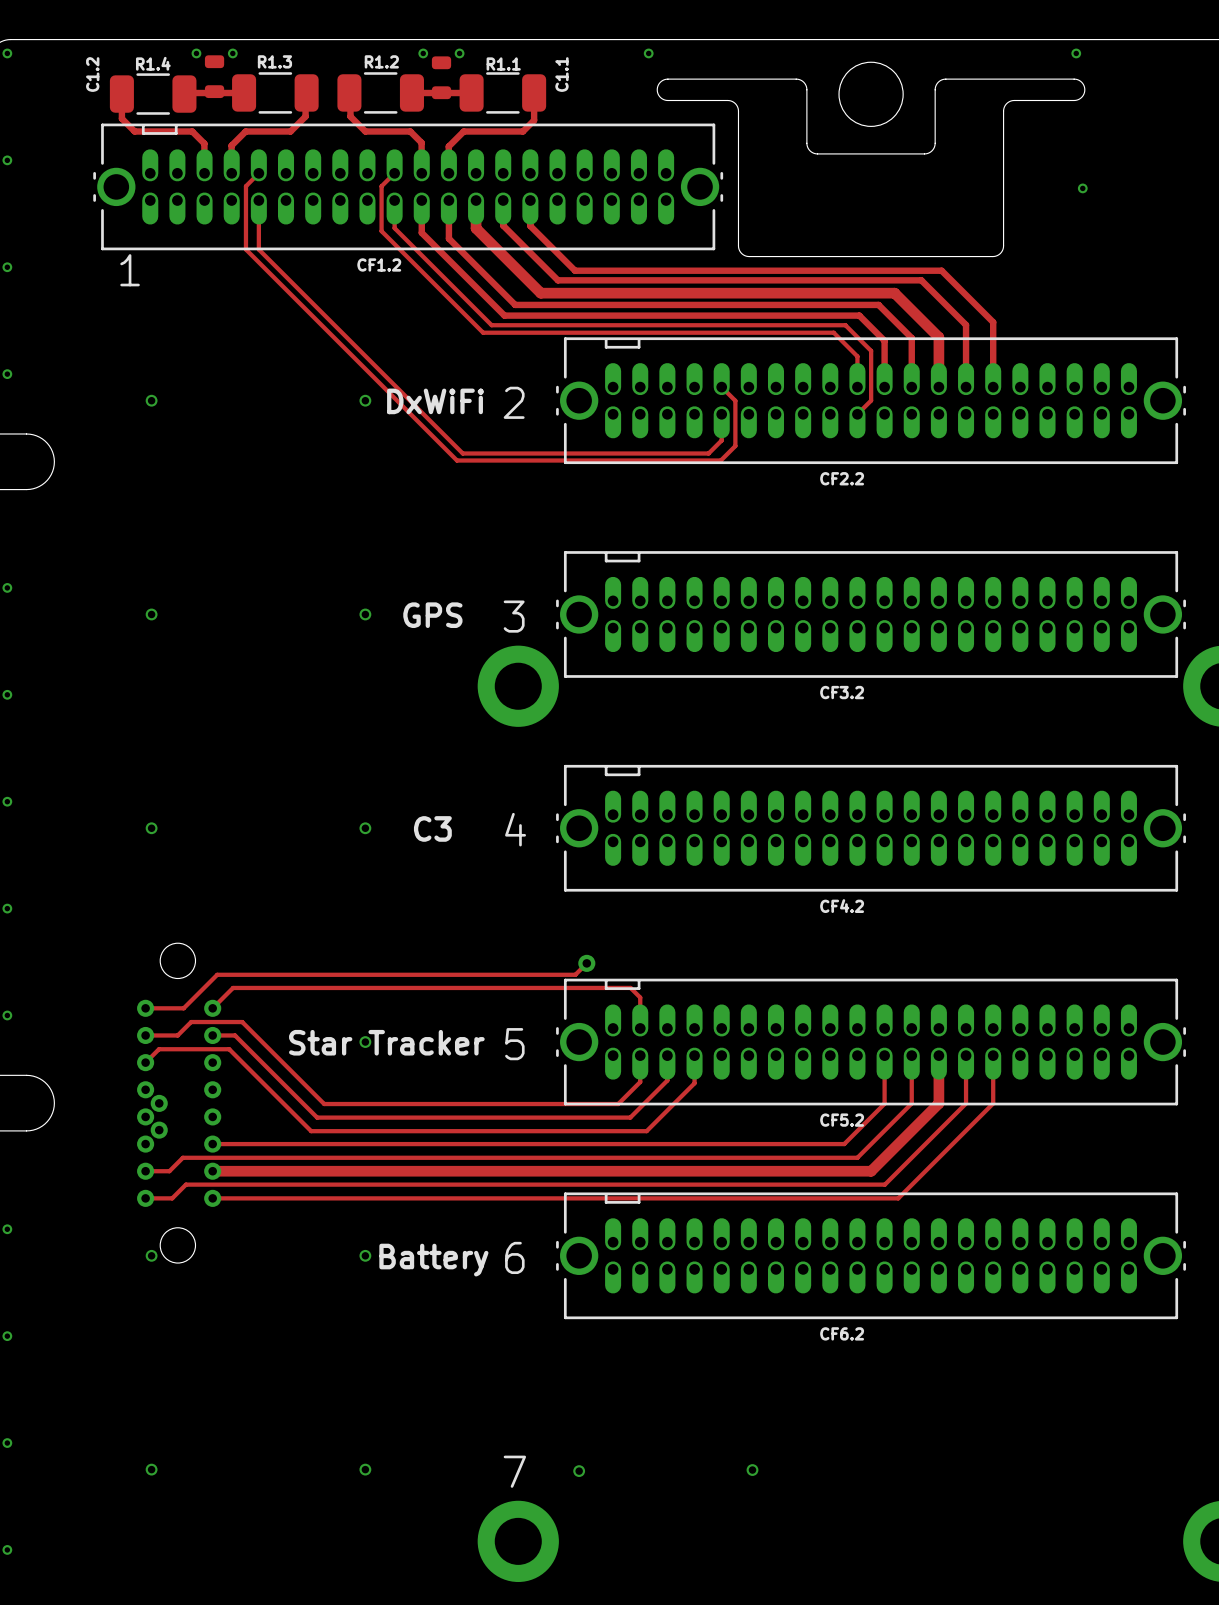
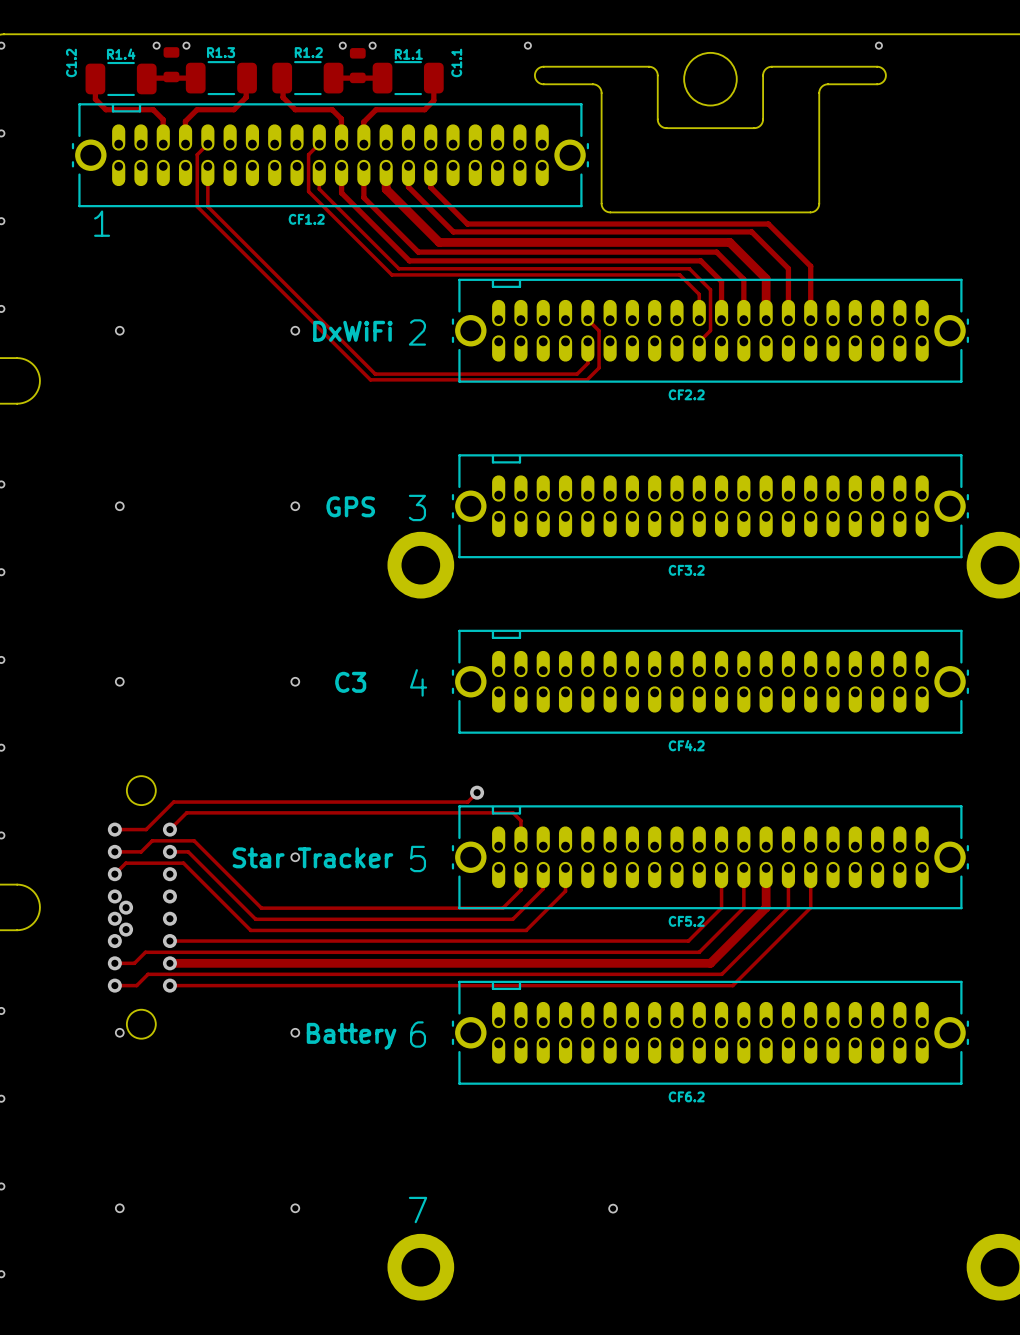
via: (1082, 188) -> none
via: (579, 1471) -> none

